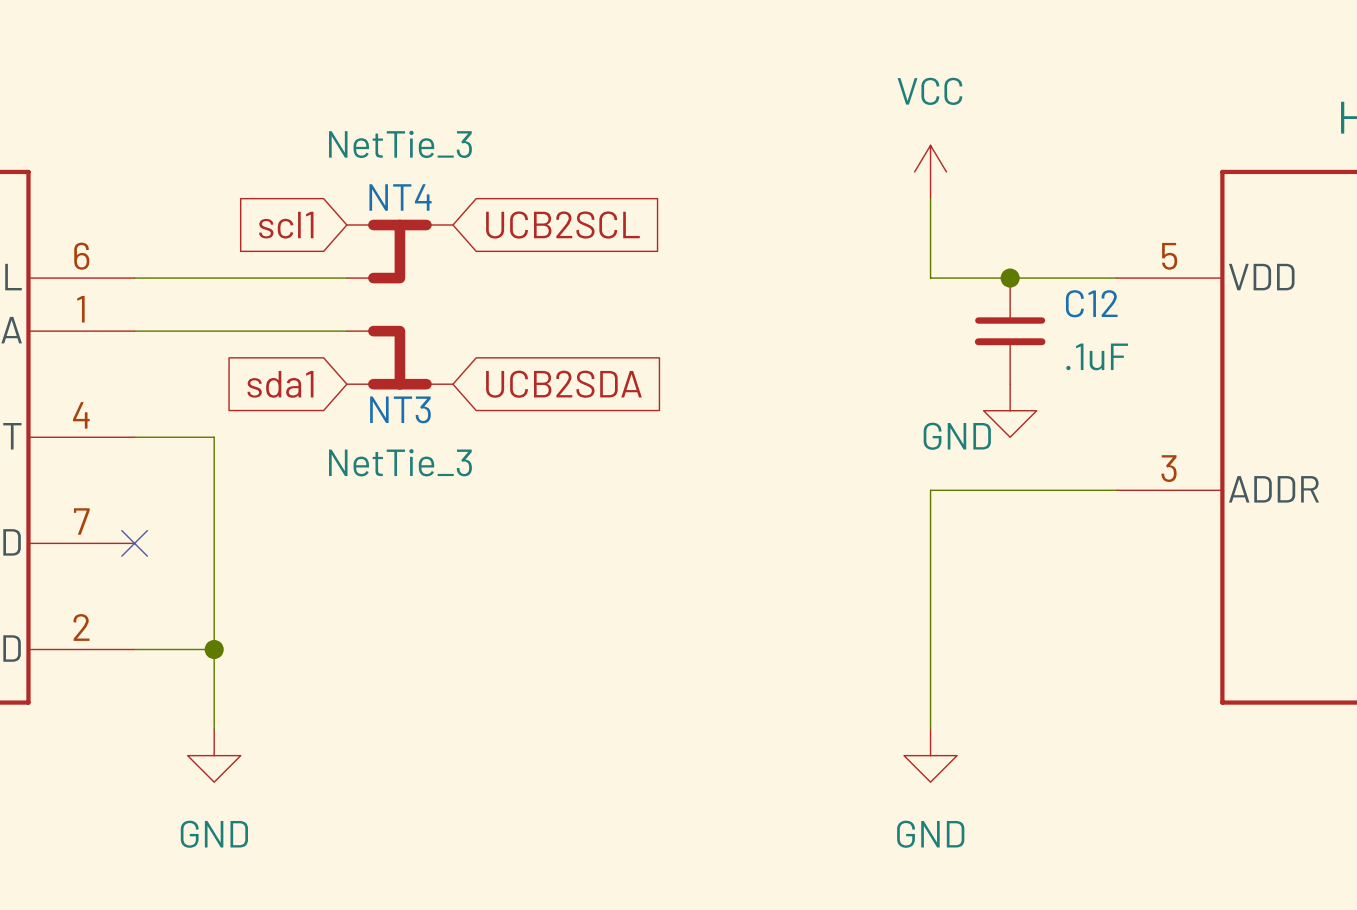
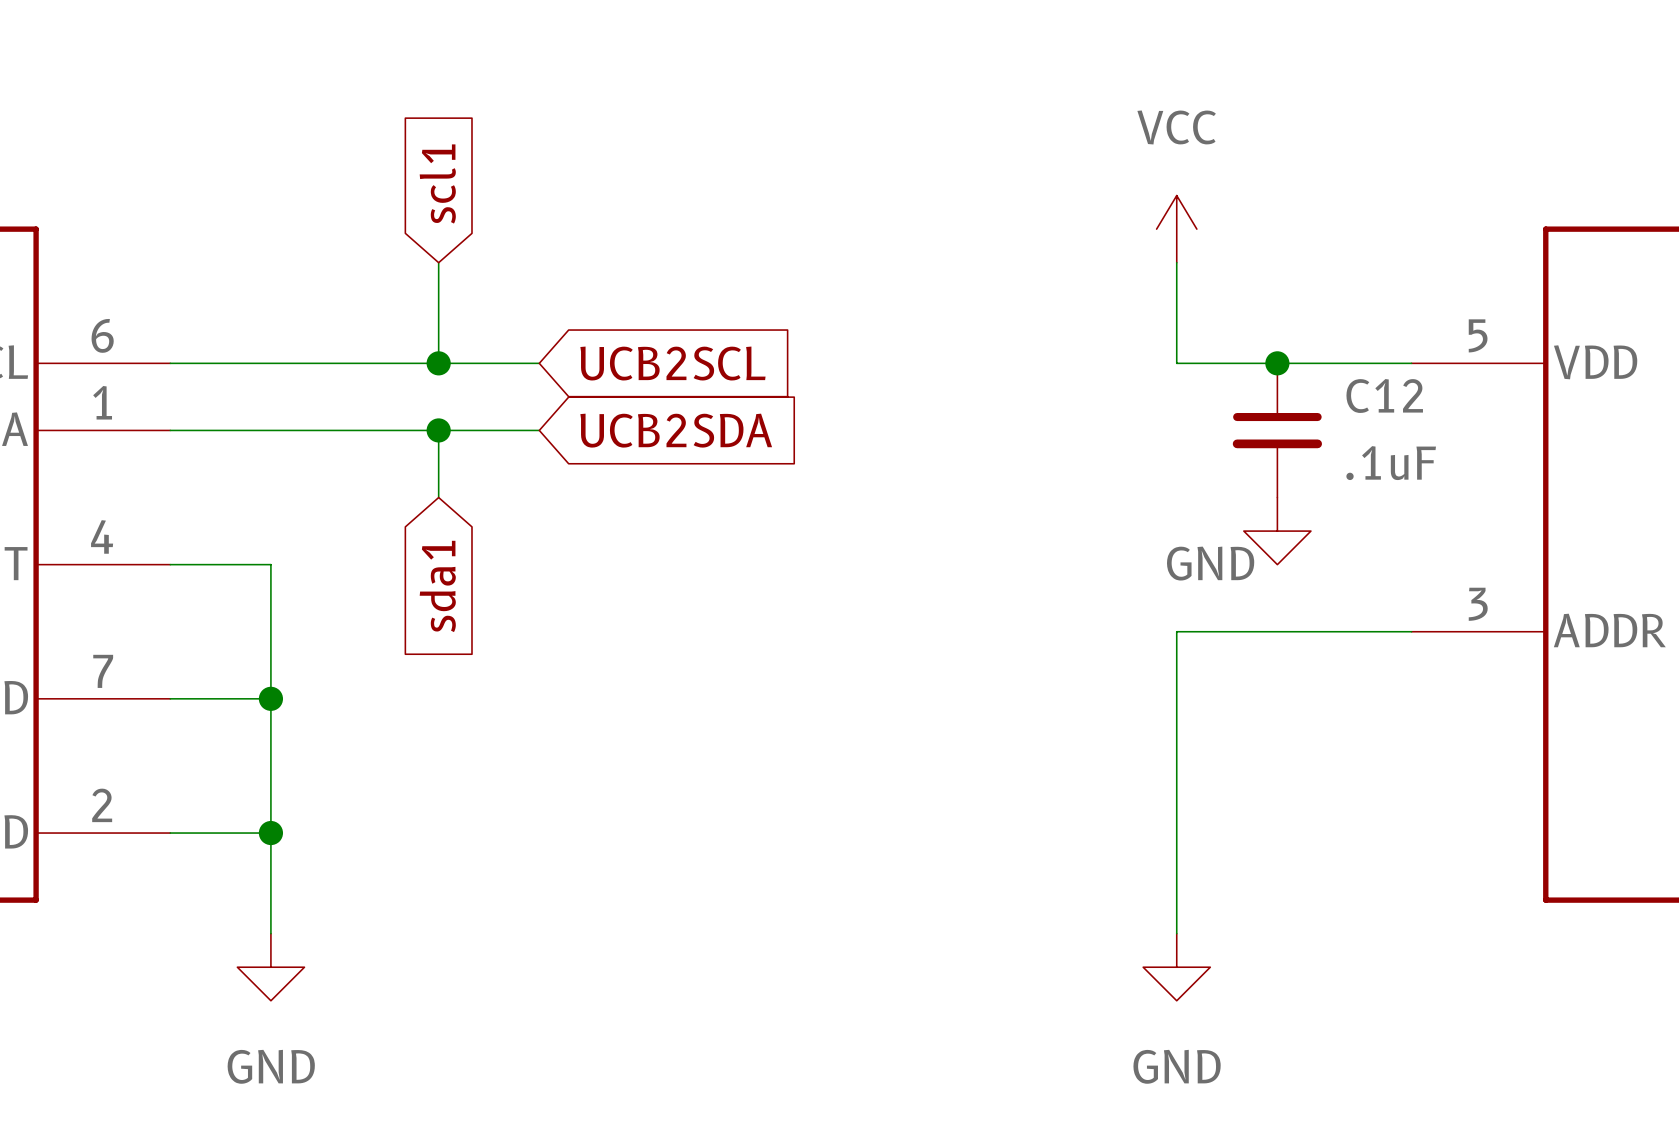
wire: none -> (438, 262) (438, 363) (539, 363)
global label rotation: 0° (286, 225) -> 90° clockwise (437, 183)
global label position: UCB2SCL (562, 225) -> UCB2SCL (672, 363)
NT4: NetTie_3 (399, 251) -> none
junction: none -> (438, 363)
junction: none -> (438, 430)
wire: none -> (539, 430) (438, 430) (438, 497)
NT3: NetTie_3 (399, 357) -> none
global label rotation: 0° (280, 384) -> 90° counterclockwise (437, 586)
global label position: UCB2SDA (563, 384) -> UCB2SDA (676, 430)
wire: none -> (170, 698) (270, 698)
no-connect mark: (134, 543) -> none
junction: none -> (270, 698)

